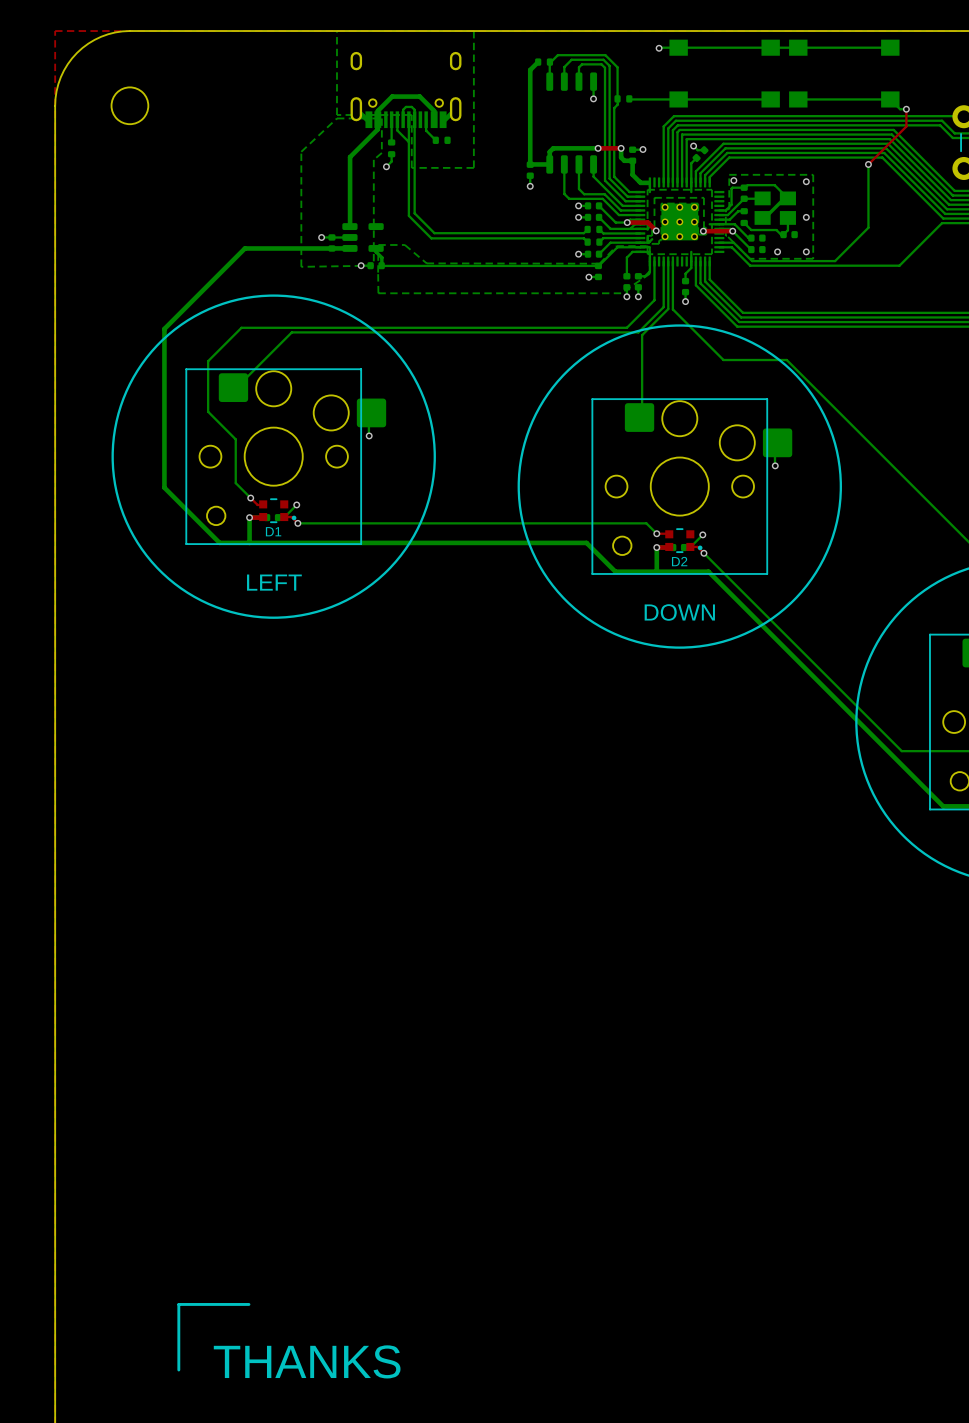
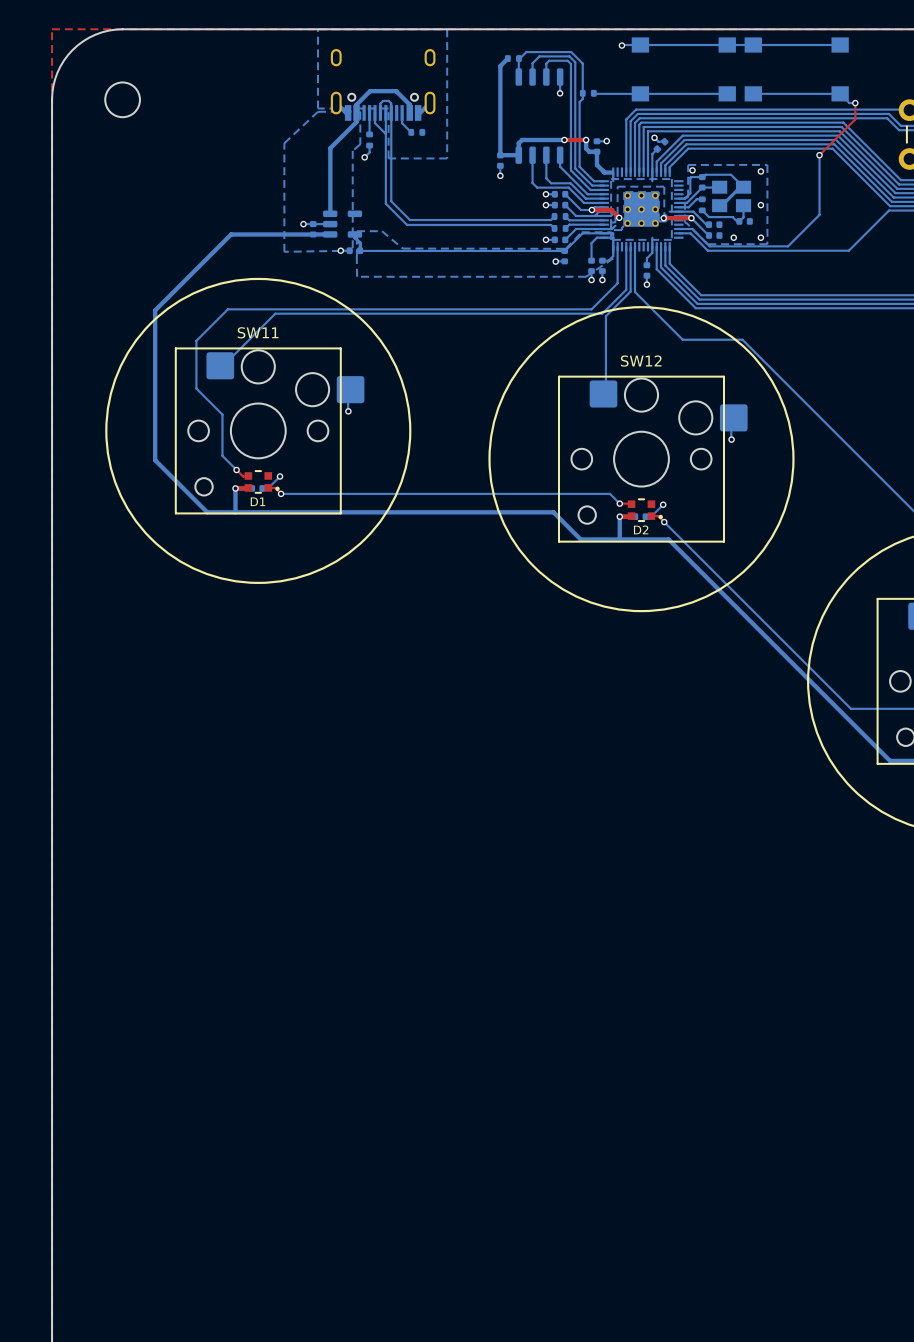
SW11 name: none -> SW11 (258, 332)
SW12 name: none -> SW12 (641, 361)
text: LEFT (274, 582) -> none
text: DOWN (679, 612) -> none
line: (248, 1304) (178, 1304) (178, 1370) -> none
text: THANKS (307, 1361) -> none

